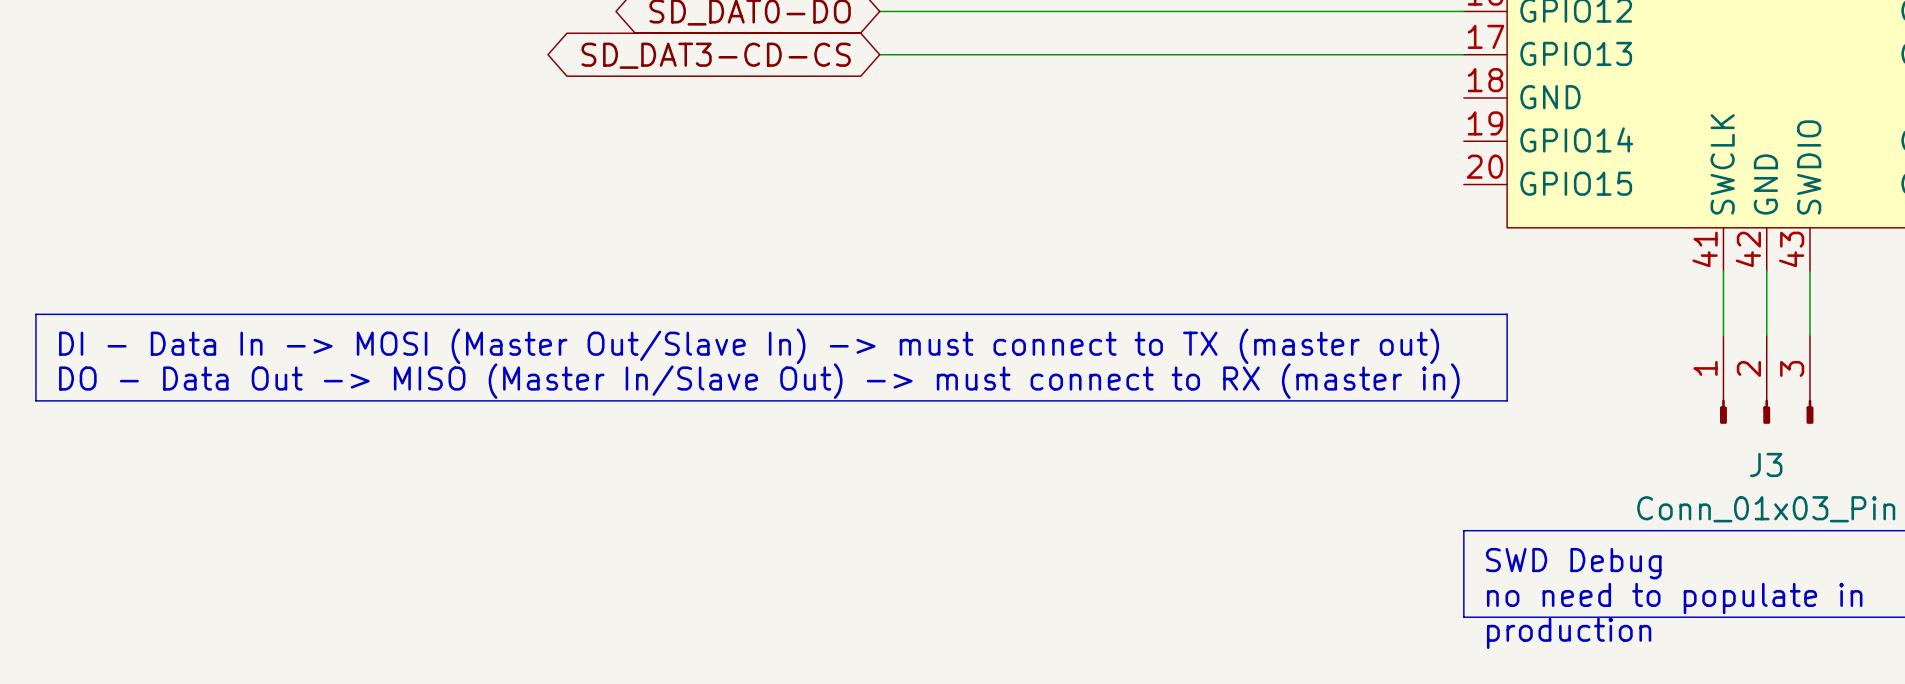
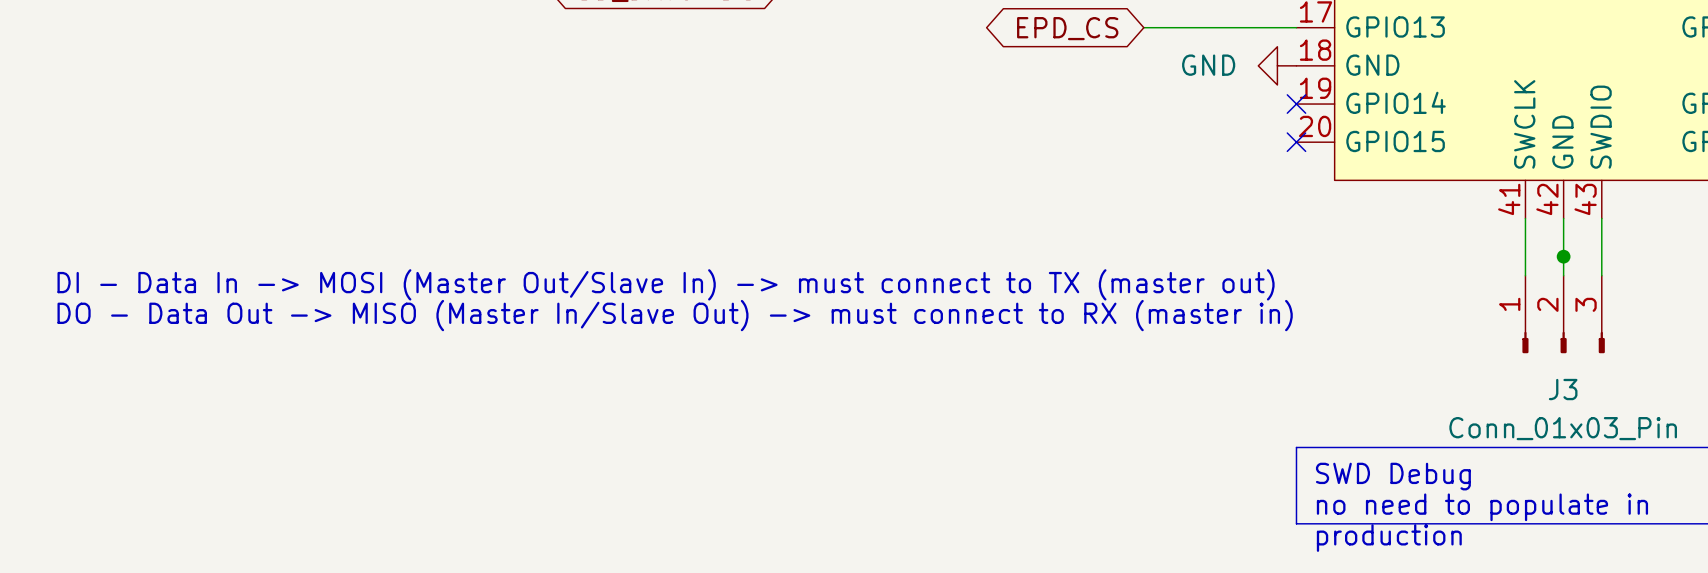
wire: (879, 54) (1290, 54) -> none
global label: SD_DAT3-CD-CS (716, 55) -> none
global label: none -> EPD_CS (1067, 28)
power symbol: none -> GND (1277, 65)
no-connect mark: none -> (1296, 104)
no-connect mark: none -> (1296, 142)
line: (35, 314) (1507, 314) (1507, 400) (35, 400) (35, 314) -> none
junction: none -> (1563, 256)

